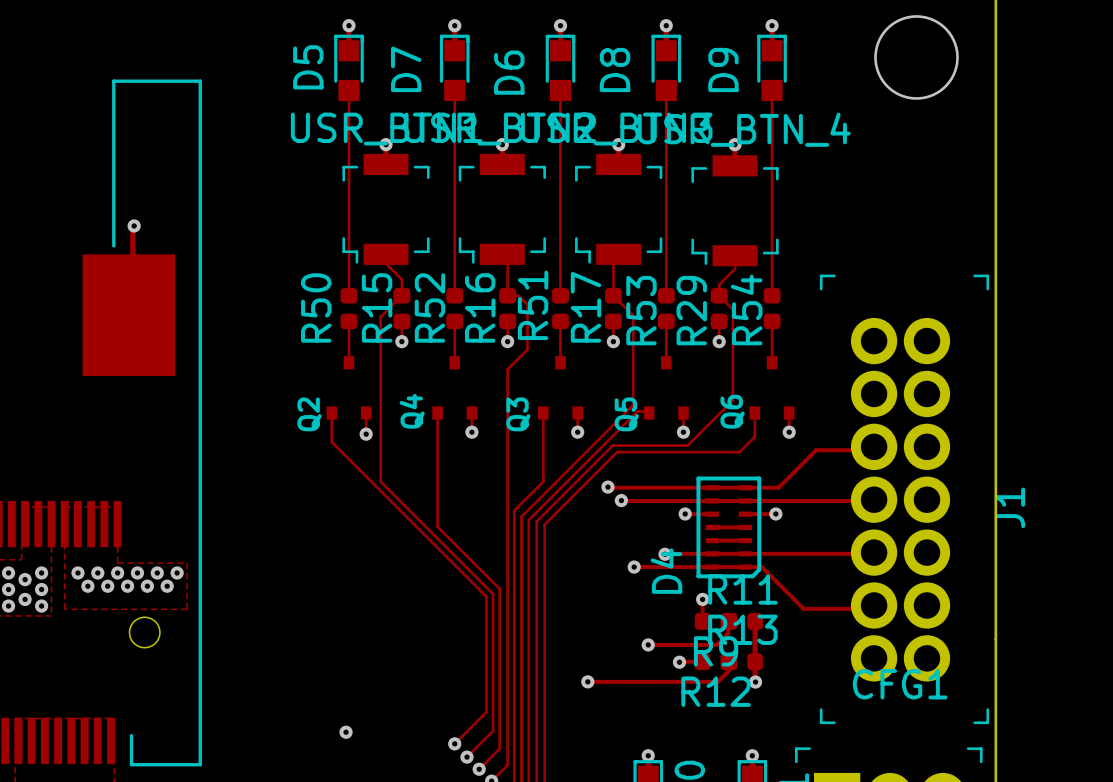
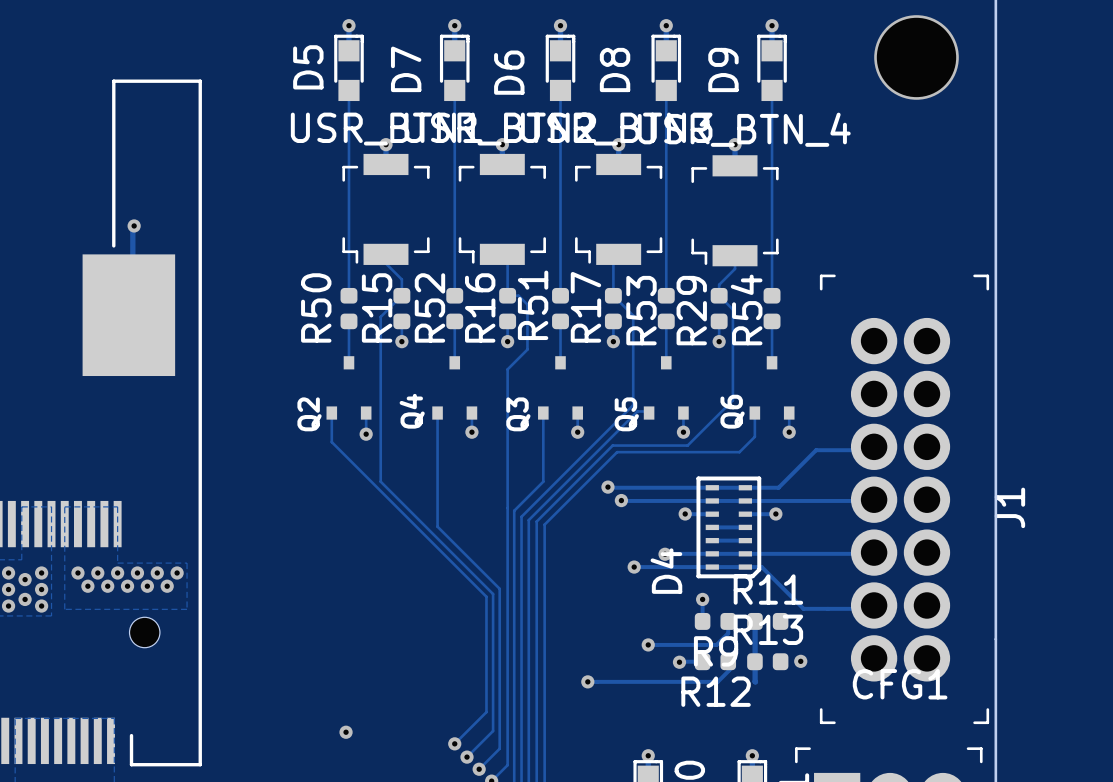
R11 position: (742, 621) -> (767, 621)
R13 position: (742, 661) -> (767, 661)
via position: (755, 682) -> (800, 661)

